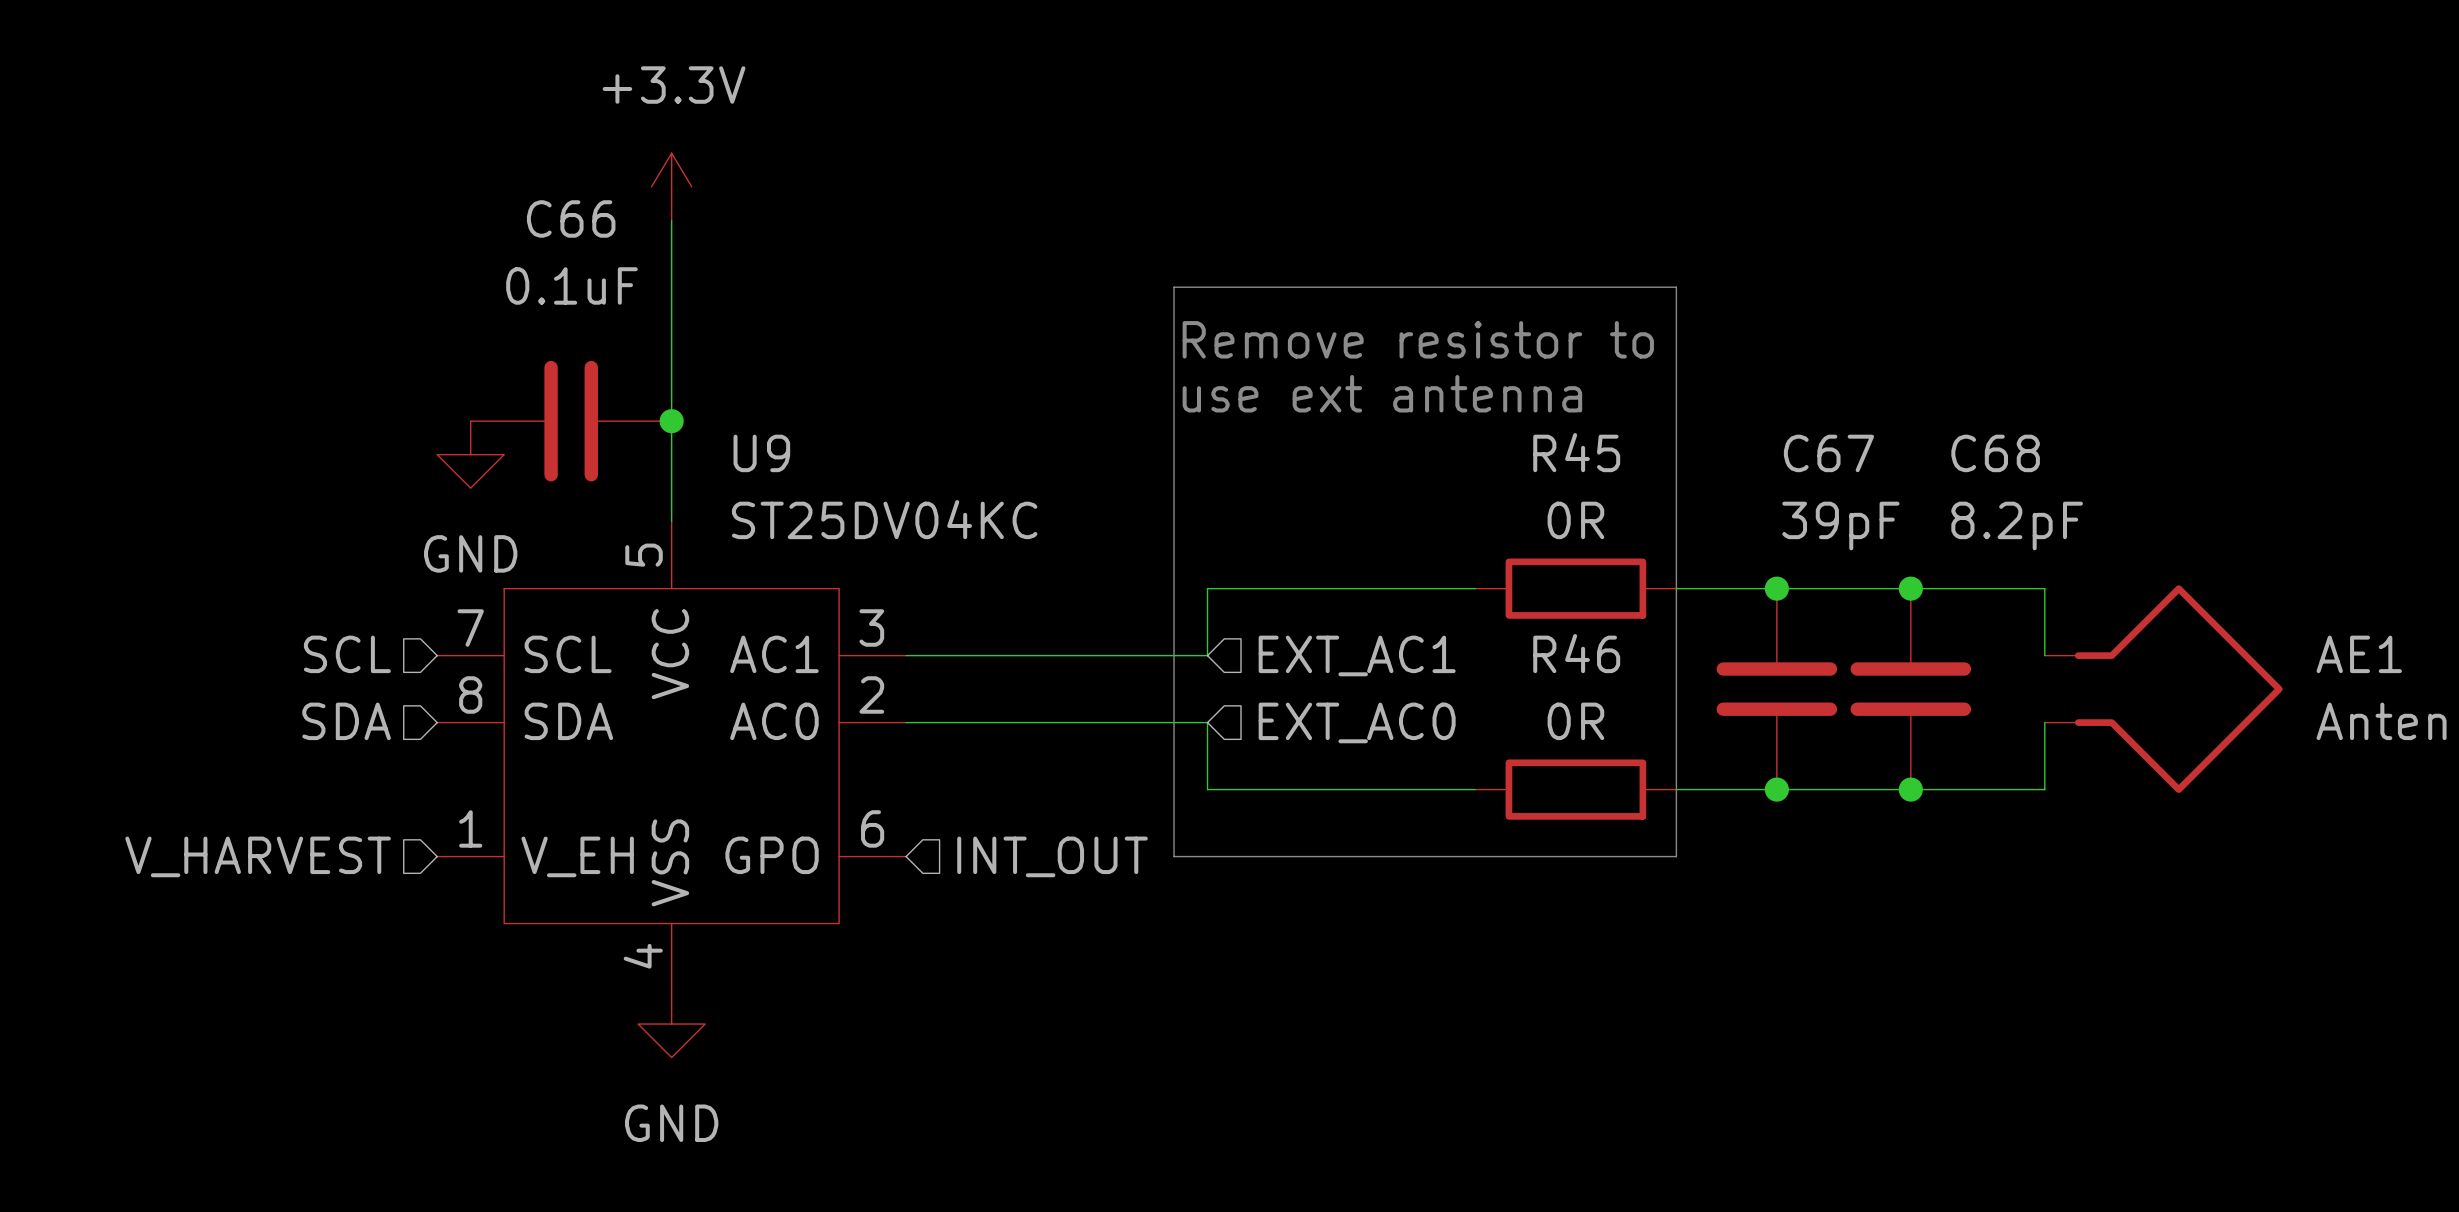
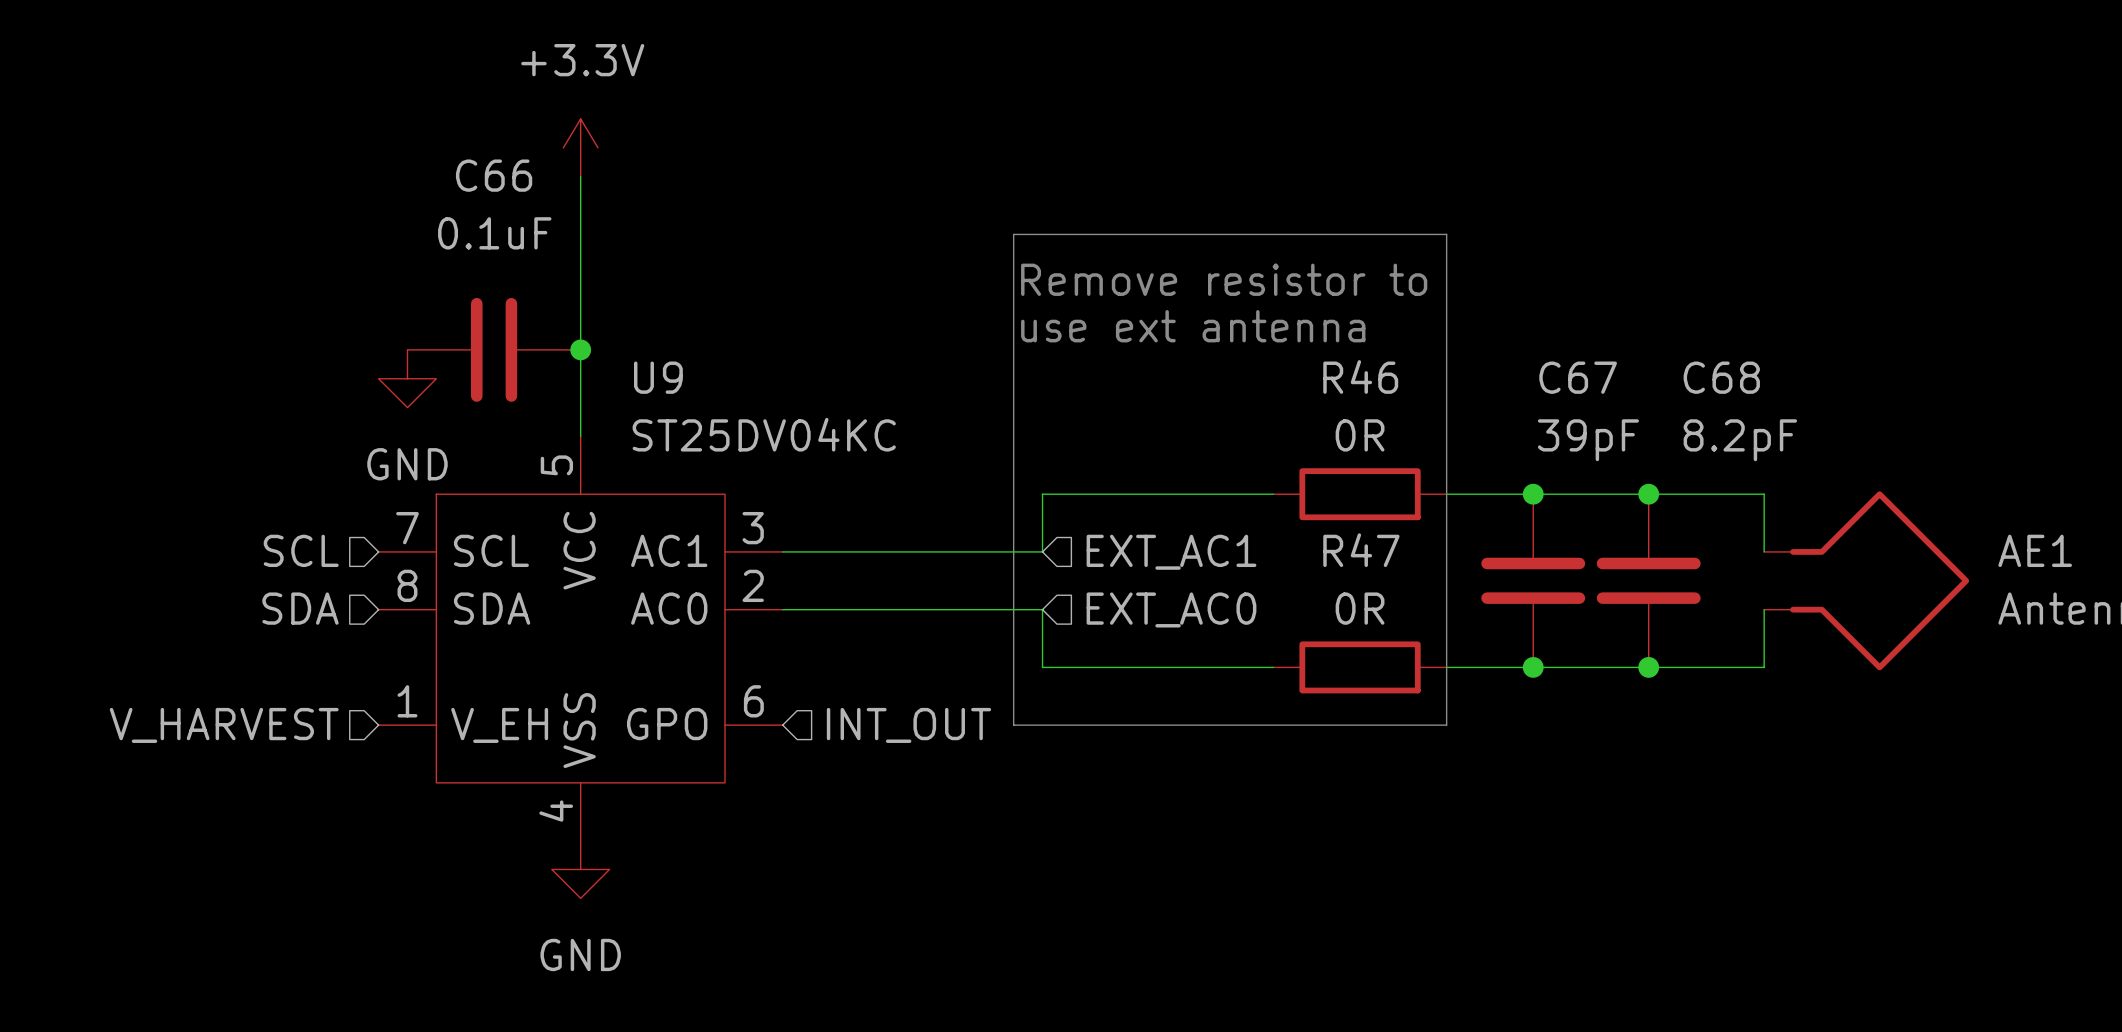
R45 name: R45 (1576, 452) -> R46 (1360, 376)
R46 name: R46 (1576, 653) -> R47 (1361, 550)

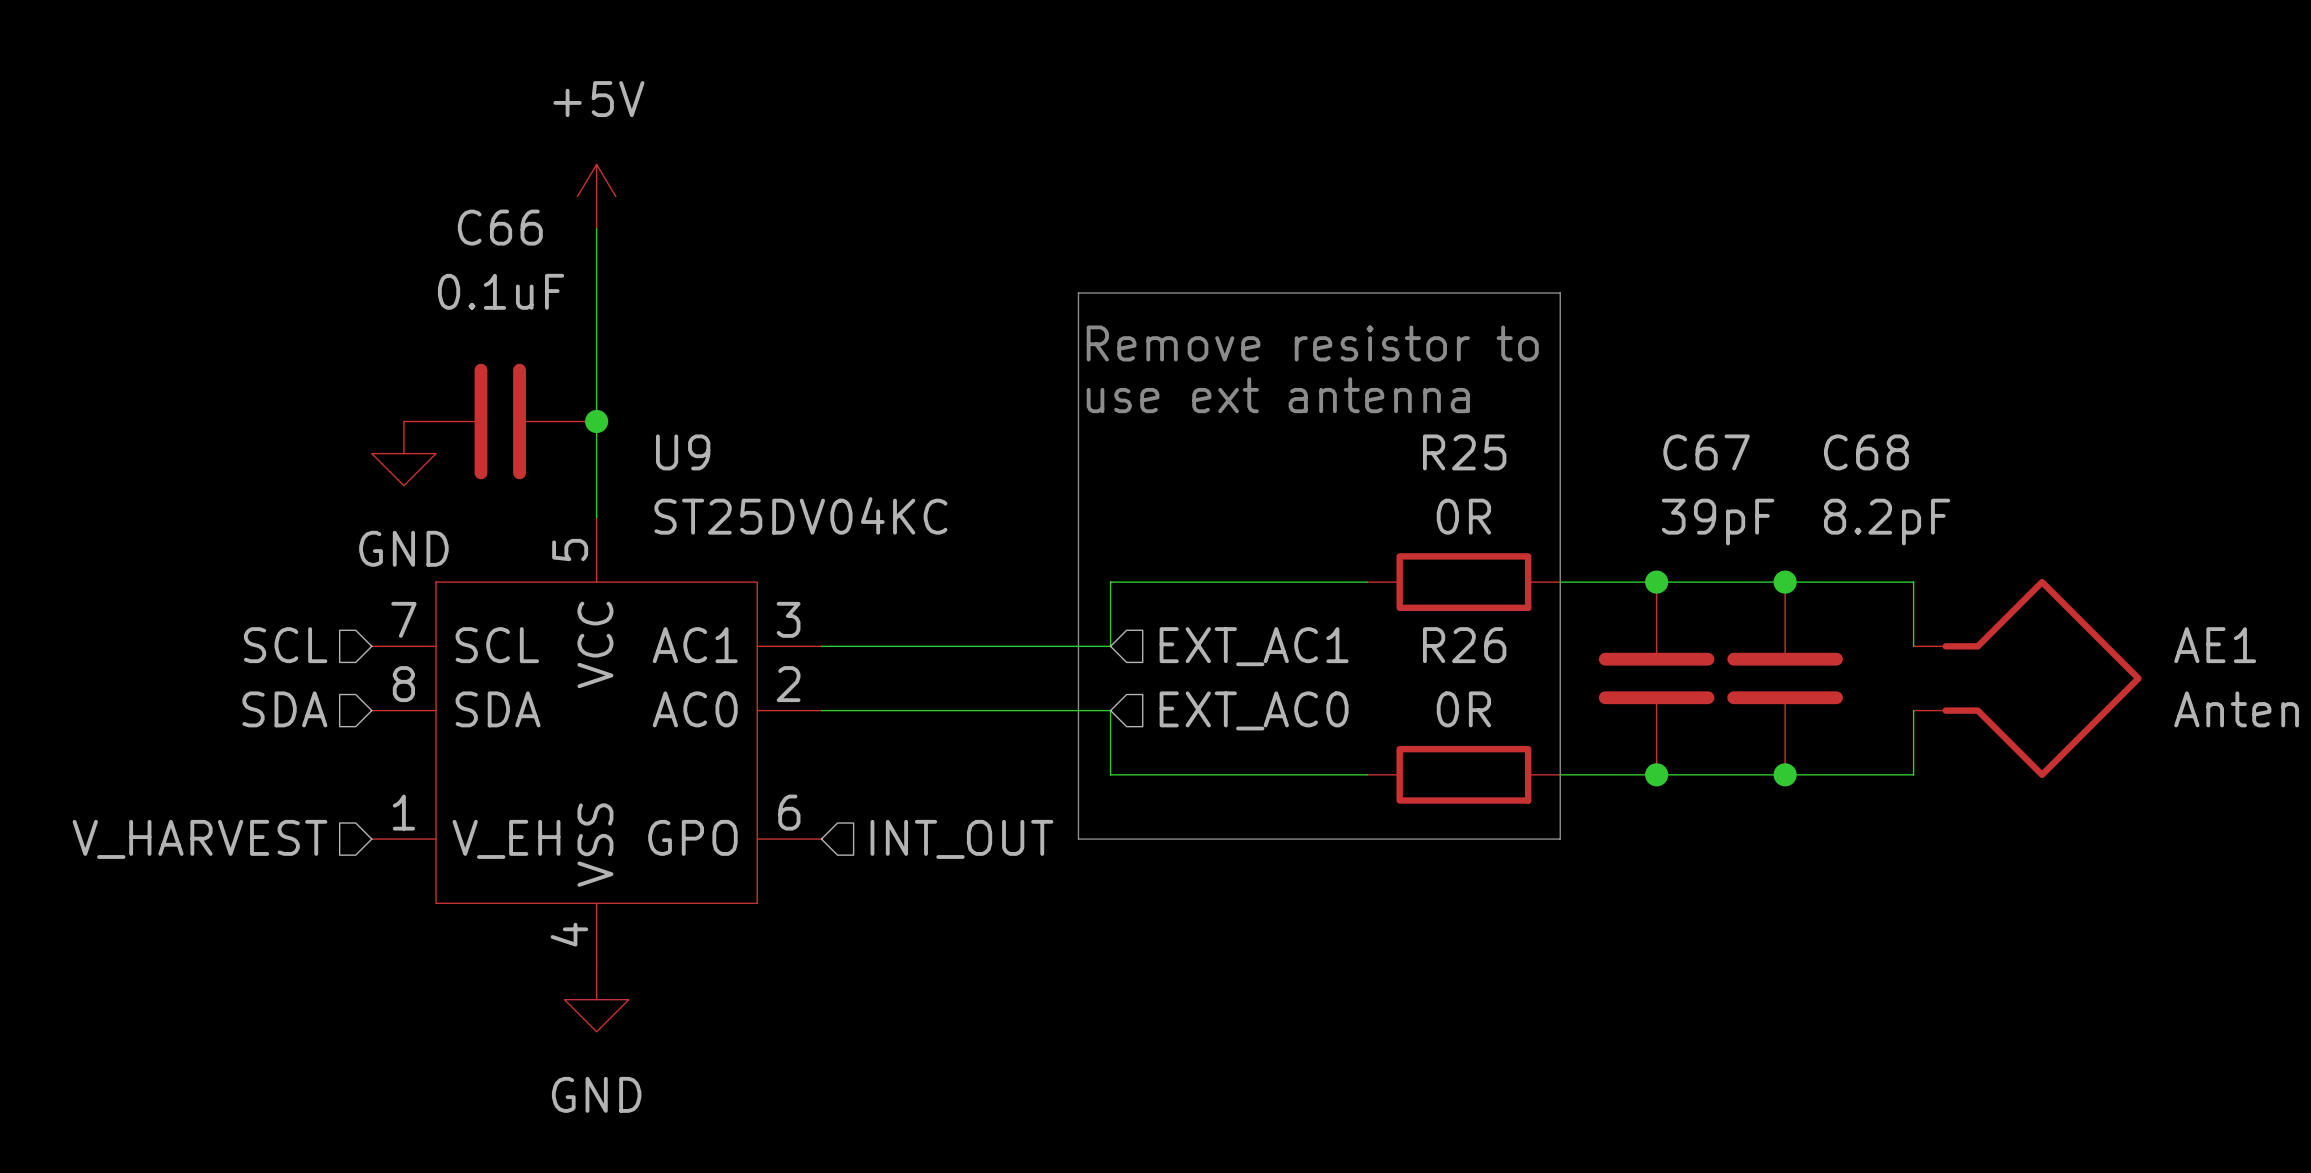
power symbol: +3.3V (580, 147) -> +5V (596, 196)
R46 name: R46 (1360, 376) -> R25 (1464, 452)
R47 name: R47 (1361, 550) -> R26 (1464, 645)

